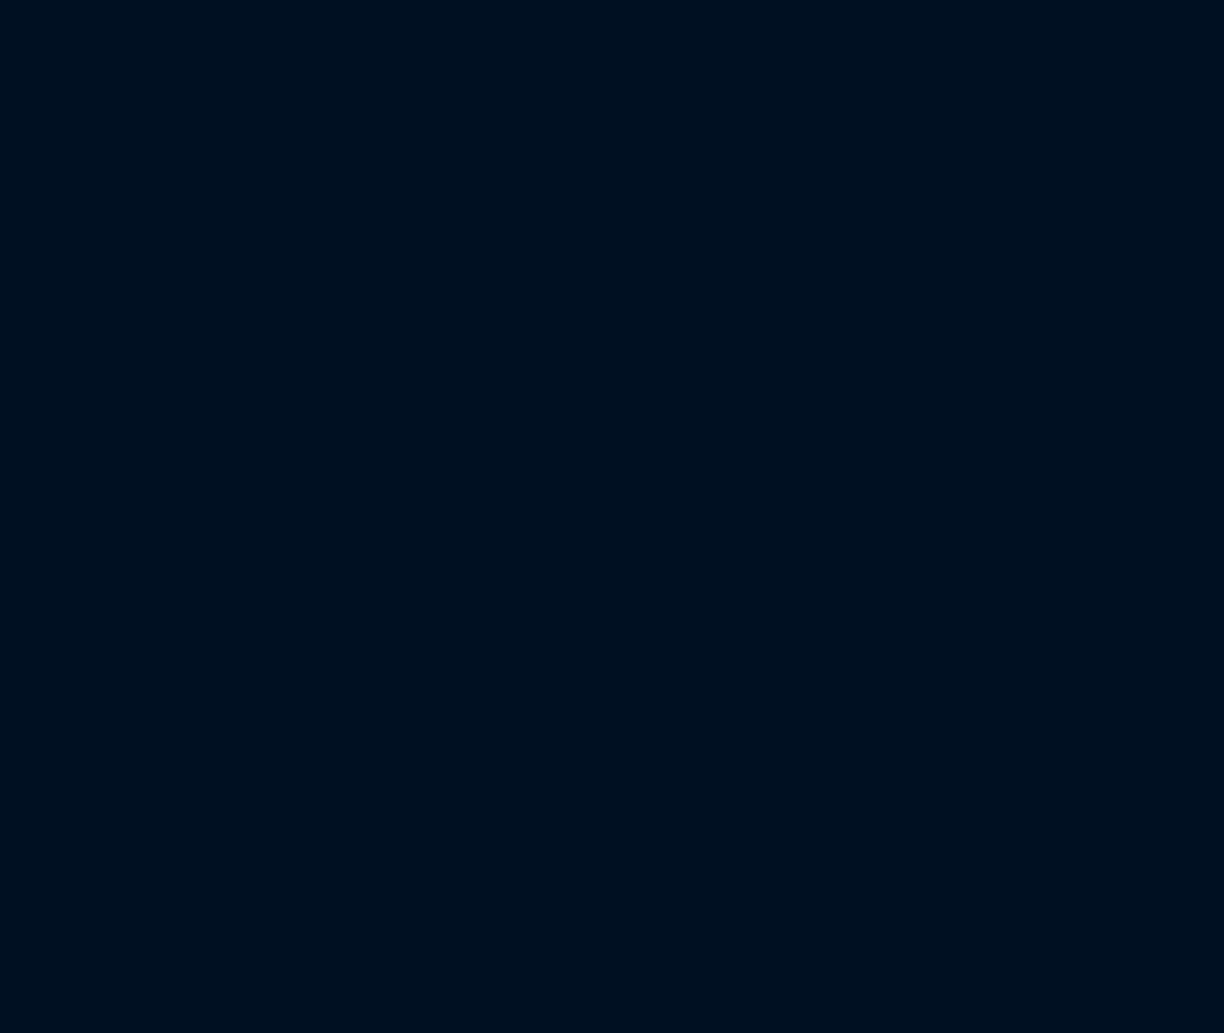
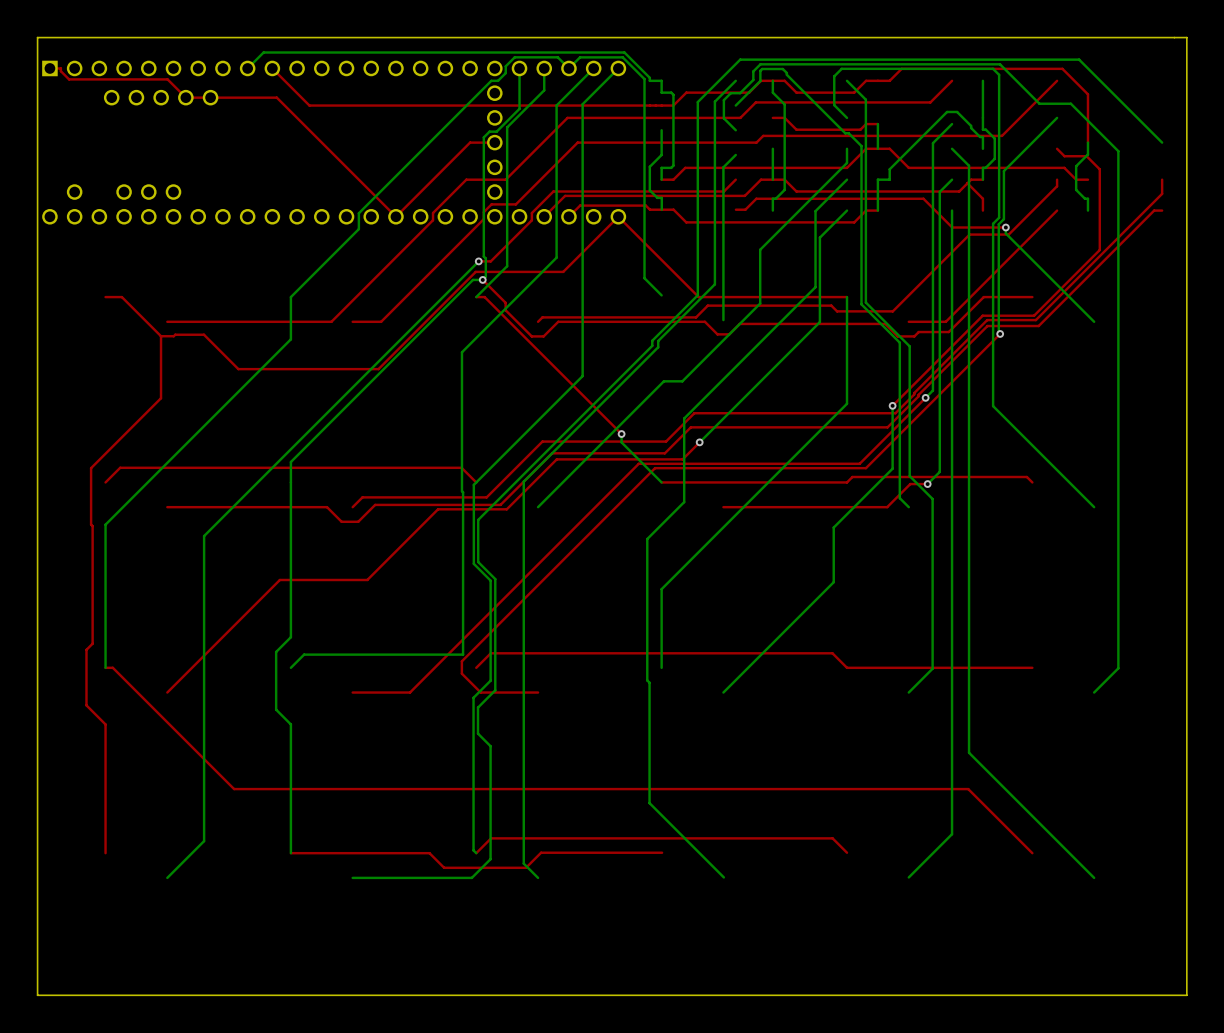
board edge: none -> (1186, 37) (1186, 995) (37, 995) (37, 37) (1186, 37)
top track: none -> (49, 68) (60, 68) (60, 71) (69, 79) (167, 79) (185, 97) (276, 97) (395, 216) (470, 142) (494, 142)
bottom track: none -> (247, 68) (263, 52) (624, 52) (649, 77) (649, 80) (661, 80) (661, 92) (671, 92) (673, 94) (673, 165) (671, 167) (661, 167) (661, 179)
top track: none -> (272, 68) (309, 105) (673, 105) (686, 92) (749, 92) (761, 80) (784, 80) (796, 92) (854, 92) (866, 80) (889, 80) (901, 68) (1062, 68) (1087, 94) (1087, 142)
bottom track: none -> (519, 68) (519, 108) (496, 131) (489, 131) (483, 137) (483, 256) (485, 258) (485, 276) (482, 279) (472, 279) (290, 462) (290, 637) (276, 651) (276, 709) (290, 724) (290, 853)
bottom track: none -> (544, 68) (544, 90) (507, 127) (507, 266) (476, 297)
bottom track: none -> (593, 68) (556, 105) (556, 257) (461, 352) (463, 654) (304, 654) (290, 667)
bottom track: none -> (618, 68) (582, 104) (582, 376) (473, 484) (473, 563) (490, 580) (490, 680) (473, 697) (473, 850) (476, 853)
bottom track: none -> (735, 80) (714, 101) (714, 284) (658, 341) (658, 347) (523, 481) (523, 863) (538, 877)
bottom track: none -> (772, 80) (772, 92) (784, 104) (784, 189) (775, 198) (772, 198) (772, 210)
bottom track: none -> (847, 80) (865, 99) (865, 302) (909, 346) (909, 476) (932, 499) (932, 668) (908, 692)
top track: none -> (952, 80) (930, 102) (755, 102) (740, 117) (567, 117) (505, 179) (466, 179) (433, 213) (433, 220) (331, 321) (167, 321)
bottom track: none -> (982, 80) (982, 129) (985, 129) (994, 138) (994, 158) (985, 167) (982, 167) (982, 179)
top track: none -> (1057, 80) (1002, 135) (763, 135) (756, 142) (577, 142) (515, 204) (491, 204) (483, 212) (483, 219) (381, 321) (352, 321)
bottom track: none -> (735, 105) (760, 80) (760, 70) (762, 69) (782, 69) (845, 133) (848, 133) (861, 146) (861, 304) (899, 342) (899, 498) (908, 507)
top track: none -> (772, 117) (784, 117) (796, 129) (860, 129) (866, 124) (877, 124)
bottom track: none -> (847, 117) (834, 105) (834, 76) (841, 68) (993, 68) (999, 74) (999, 217) (993, 223) (993, 406) (1094, 507)
bottom track: none -> (1057, 117) (1003, 171) (1003, 219) (998, 224) (1000, 333)
bottom track: none -> (877, 124) (877, 148)
bottom track: none -> (952, 124) (932, 143) (932, 390) (925, 397)
bottom track: none -> (661, 130) (661, 154) (649, 166) (649, 190) (657, 197) (661, 197) (661, 209)
bottom track: none -> (735, 130) (723, 118) (723, 100) (730, 93) (740, 93) (753, 79) (753, 71) (760, 64) (1000, 64) (1039, 103) (1070, 103) (1118, 151) (1118, 668) (1094, 692)
part: none -> (334, 142)
bottom track: none -> (1087, 142) (1087, 154) (1076, 166) (1076, 189) (1085, 198) (1087, 198) (1087, 210)
bottom track: none -> (1162, 142) (1079, 59) (740, 59) (697, 102) (697, 295) (652, 340) (652, 345) (478, 519) (478, 562) (495, 579) (495, 690) (478, 707) (478, 733) (490, 746) (490, 859) (471, 877) (352, 877)
bottom track: none -> (772, 148) (772, 179)
bottom track: none -> (847, 148) (847, 162) (760, 249) (760, 303) (682, 381) (663, 381) (538, 507)
bottom track: none -> (952, 148) (969, 165) (969, 752) (1094, 877)
bottom track: none -> (982, 148) (982, 136) (980, 136) (957, 111) (947, 111) (889, 169) (889, 179) (877, 179) (877, 210)
top track: none -> (1057, 148) (1064, 156) (1086, 156) (1099, 169) (1099, 250) (1034, 315) (982, 315) (892, 405)
bottom track: none -> (735, 154) (723, 167) (723, 320)
top track: none -> (735, 179) (723, 191) (553, 191) (531, 213) (531, 220) (490, 261) (478, 261)
bottom track: none -> (847, 179) (815, 211) (815, 287) (684, 418) (684, 502) (647, 539) (649, 803) (723, 877)
bottom track: none -> (952, 179) (939, 191) (939, 471) (927, 484)
top track: none -> (982, 179) (971, 179) (959, 191) (796, 191) (784, 179) (761, 179) (744, 195) (565, 195) (544, 216)
top track: none -> (1057, 179) (1057, 186) (1008, 234) (969, 234) (892, 311) (837, 311) (831, 305) (707, 305) (696, 317) (542, 317) (538, 321)
top track: none -> (1087, 179) (1076, 179) (1064, 167) (908, 167) (889, 148) (866, 148) (847, 167) (685, 167) (673, 179) (661, 179)
top track: none -> (1162, 179) (1162, 193) (1035, 320) (987, 320) (895, 413) (694, 413) (666, 441) (542, 441) (486, 497) (362, 497) (352, 507)
top track: none -> (967, 183) (982, 198) (982, 210)
top track: none -> (735, 209) (745, 209) (756, 198) (923, 198) (952, 227) (1005, 227)
bottom track: none -> (847, 210) (819, 237) (819, 322) (699, 442)
top track: none -> (877, 210) (866, 210) (854, 222) (686, 222) (673, 209) (649, 209) (645, 205) (580, 205) (568, 216)
bottom track: none -> (952, 210) (952, 834) (908, 877)
top track: none -> (1057, 210) (945, 321) (908, 321)
top track: none -> (1162, 210) (1154, 210) (1038, 326) (987, 326) (887, 427) (690, 427) (664, 453) (552, 453) (500, 504) (375, 504) (358, 521) (341, 521) (327, 507) (167, 507)
bottom track: none -> (1005, 227) (1005, 233) (1094, 321)
via: none -> (1005, 227)
bottom track: none -> (478, 261) (204, 536) (204, 841) (167, 877)
via: none -> (478, 261)
top track: none -> (482, 279) (505, 302) (505, 310) (531, 336) (543, 336) (558, 321) (704, 321) (717, 334) (729, 334) (739, 323) (885, 323) (897, 336) (914, 336) (918, 332) (948, 332) (983, 297) (1032, 297)
via: none -> (482, 279)
bottom track: none -> (661, 295) (644, 278) (644, 79) (622, 57) (580, 57) (568, 68) (557, 57) (514, 57) (505, 66) (505, 73) (498, 80) (491, 80) (358, 213) (358, 229) (290, 297) (290, 339) (105, 524) (105, 667)
top track: none -> (105, 297) (121, 297) (161, 336)
top track: none -> (476, 297) (484, 297) (621, 434)
top track: none -> (847, 297) (698, 297) (618, 216) (563, 271) (475, 271) (378, 369) (238, 369) (203, 334) (161, 336)
bottom track: none -> (847, 297) (847, 403) (661, 589) (661, 667)
top track: none -> (1000, 333) (865, 468) (655, 468) (461, 661) (461, 673) (480, 692) (538, 692)
via: none -> (1000, 333)
top track: none -> (161, 336) (161, 398) (91, 468) (92, 643) (86, 649) (86, 705) (105, 724) (105, 853)
top track: none -> (925, 397) (859, 463) (638, 463) (410, 692) (352, 692)
via: none -> (925, 397)
bottom track: none -> (892, 405) (892, 468) (833, 527) (833, 582) (723, 692)
via: none -> (892, 405)
bottom track: none -> (621, 434) (621, 442) (661, 482)
via: none -> (621, 434)
top track: none -> (699, 442) (682, 459) (556, 459) (506, 509) (438, 509) (367, 579) (279, 579) (167, 692)
via: none -> (699, 442)
top track: none -> (476, 482) (461, 467) (120, 467) (105, 482)
top track: none -> (1032, 482) (1026, 477) (852, 477) (847, 482) (661, 482)
top track: none -> (927, 484) (910, 484) (887, 507) (723, 507)
via: none -> (927, 484)
top track: none -> (105, 667) (112, 667) (234, 789) (968, 789) (1032, 853)
top track: none -> (1032, 667) (847, 667) (832, 653) (490, 653) (476, 667)
top track: none -> (662, 852) (541, 852) (526, 867) (444, 867) (429, 853) (290, 853)
top track: none -> (847, 852) (832, 838) (491, 838) (476, 853)

